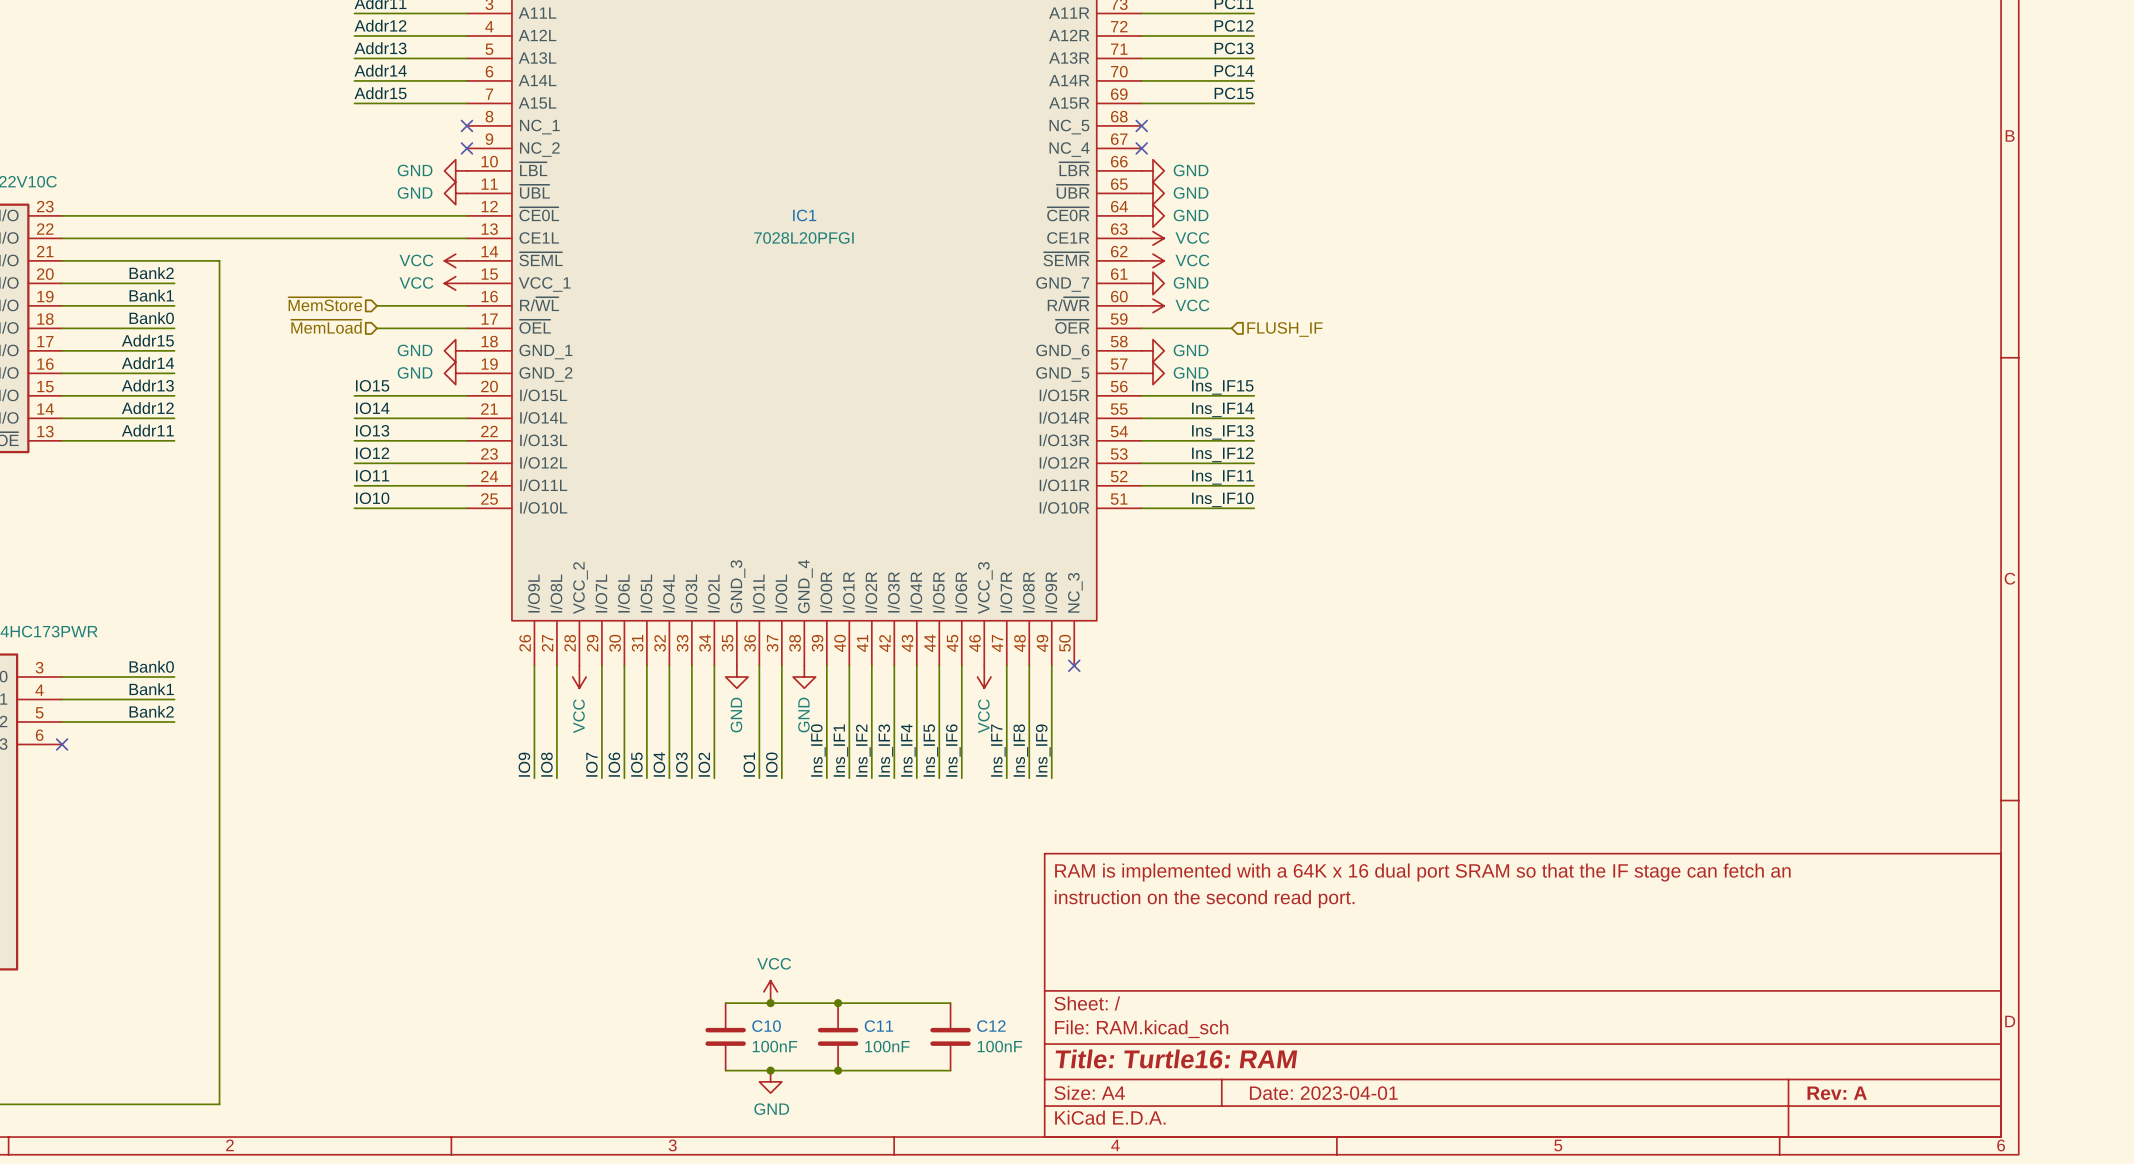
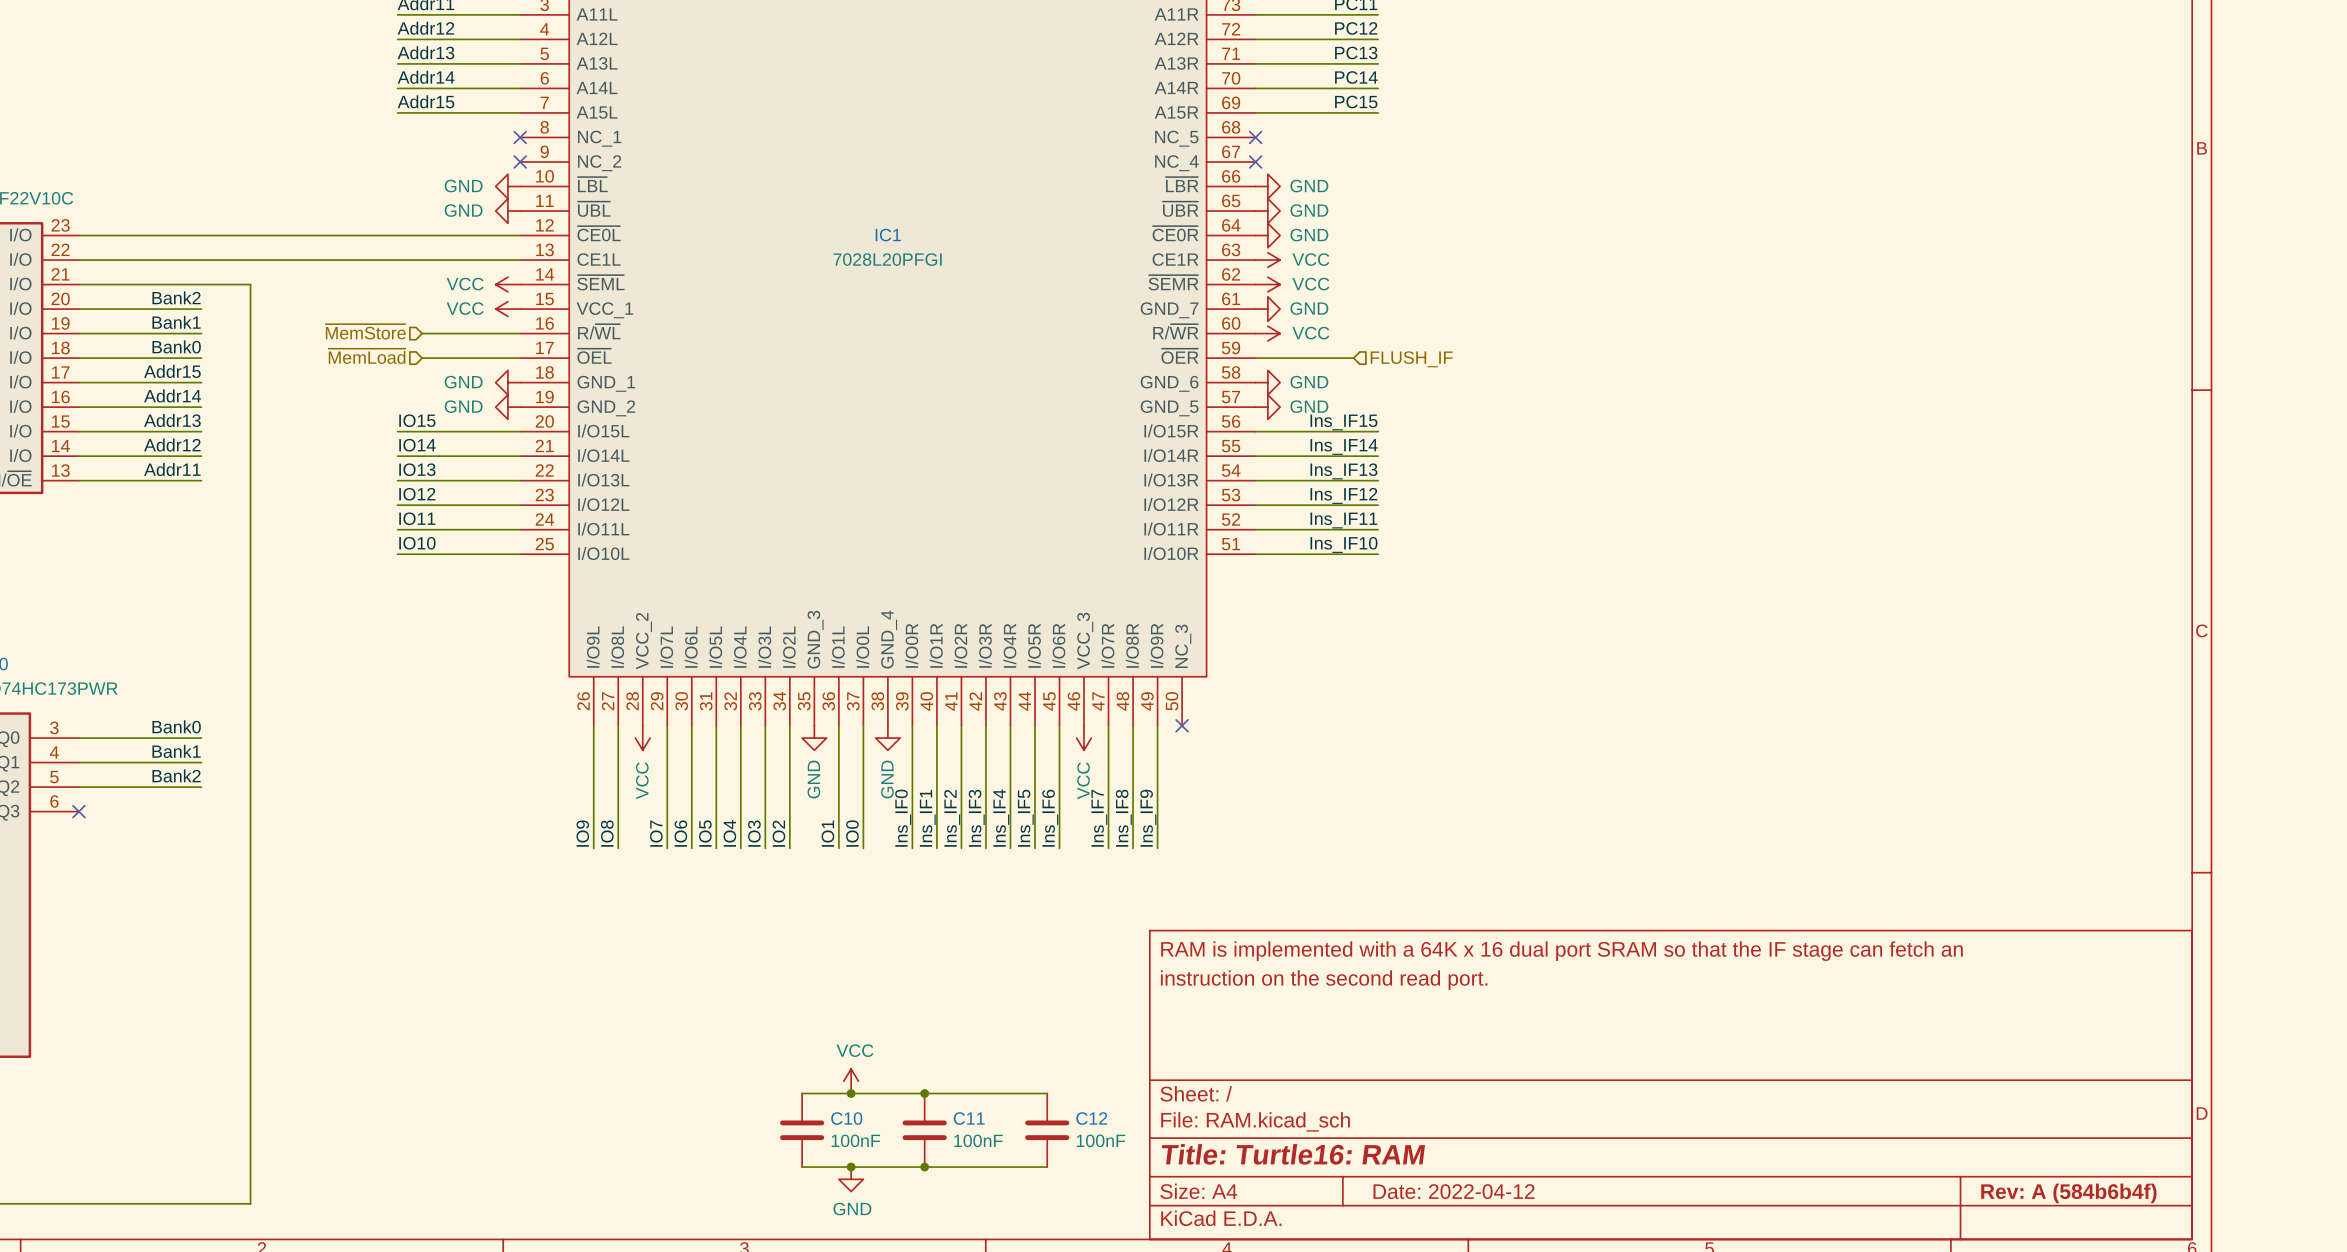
title block: Date: 2023-04-01 (1323, 1093) -> Date: 2022-04-12 (1454, 1191)
title block: Rev: A (1837, 1093) -> Rev: A (584b6b4f) (2068, 1193)

